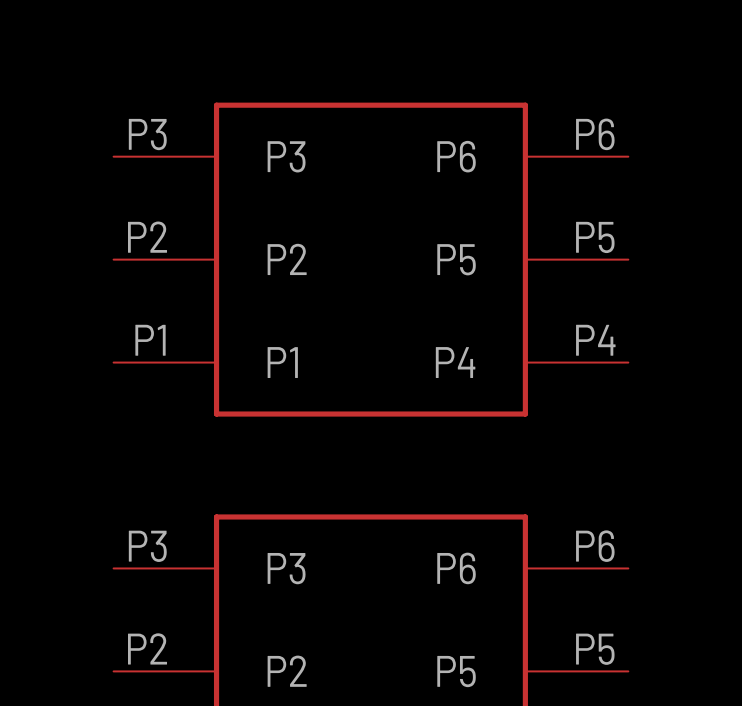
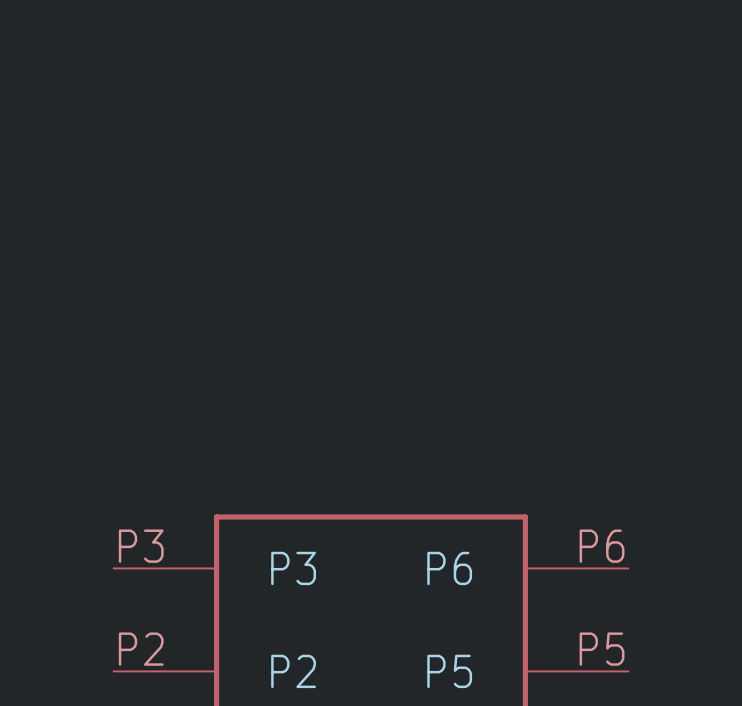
part: (370, 259) -> none

